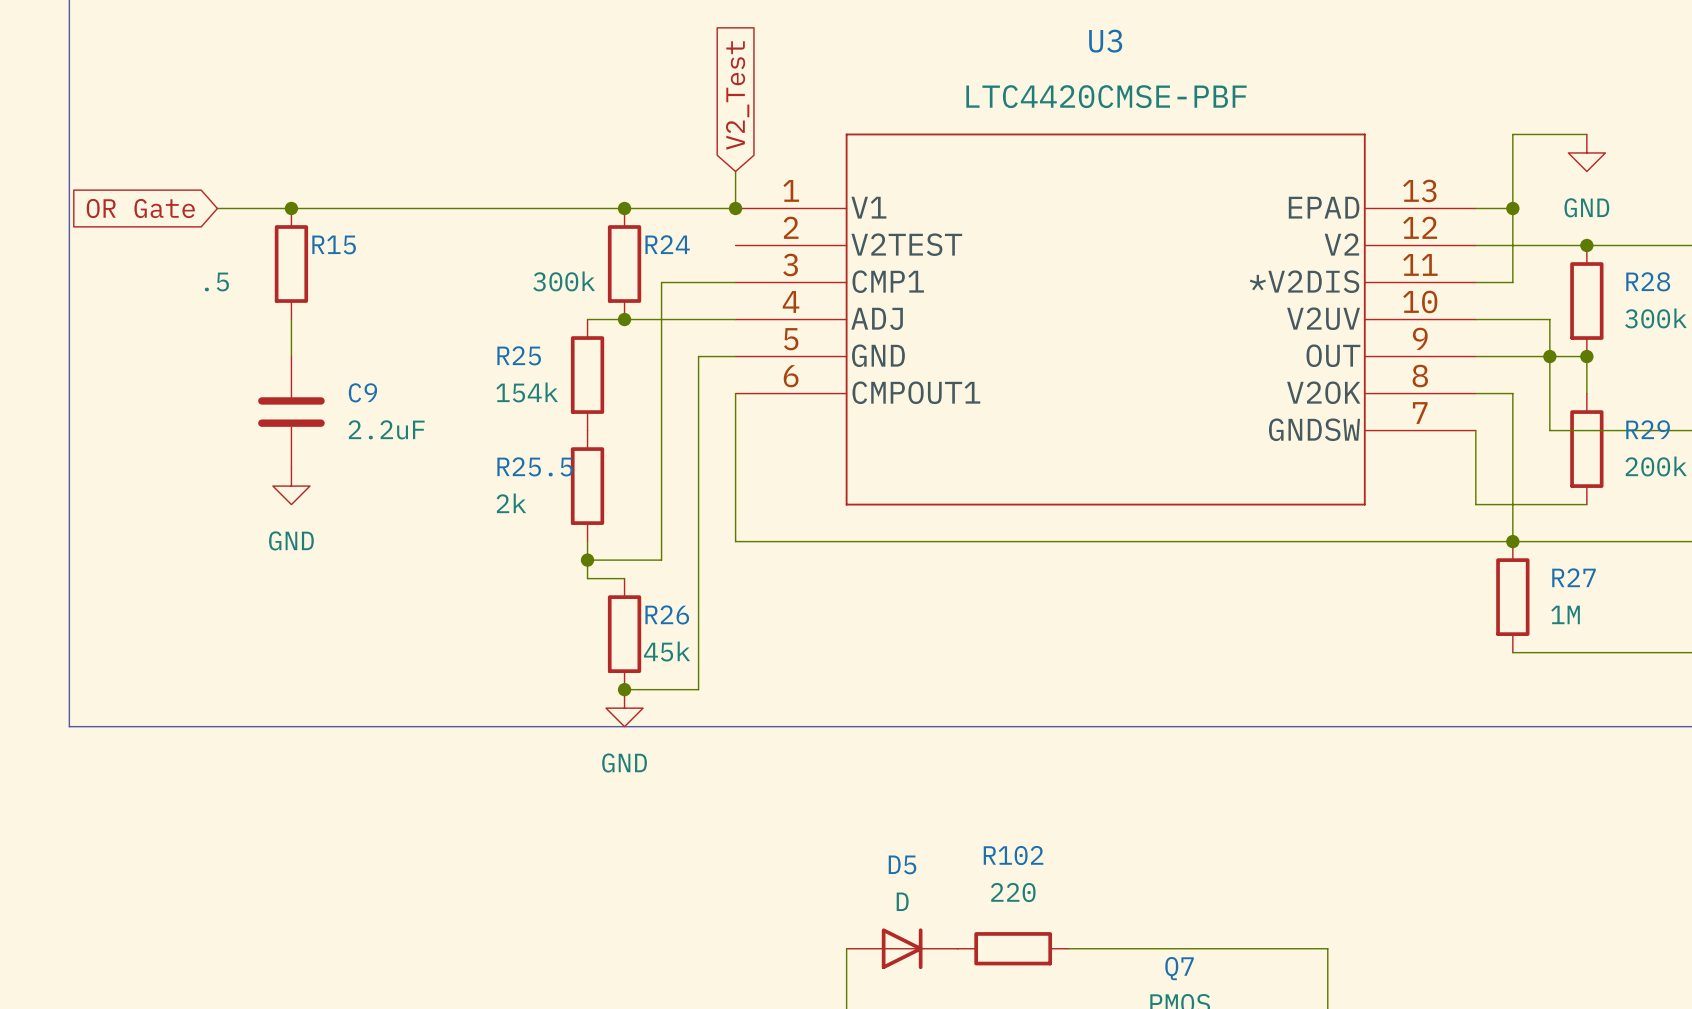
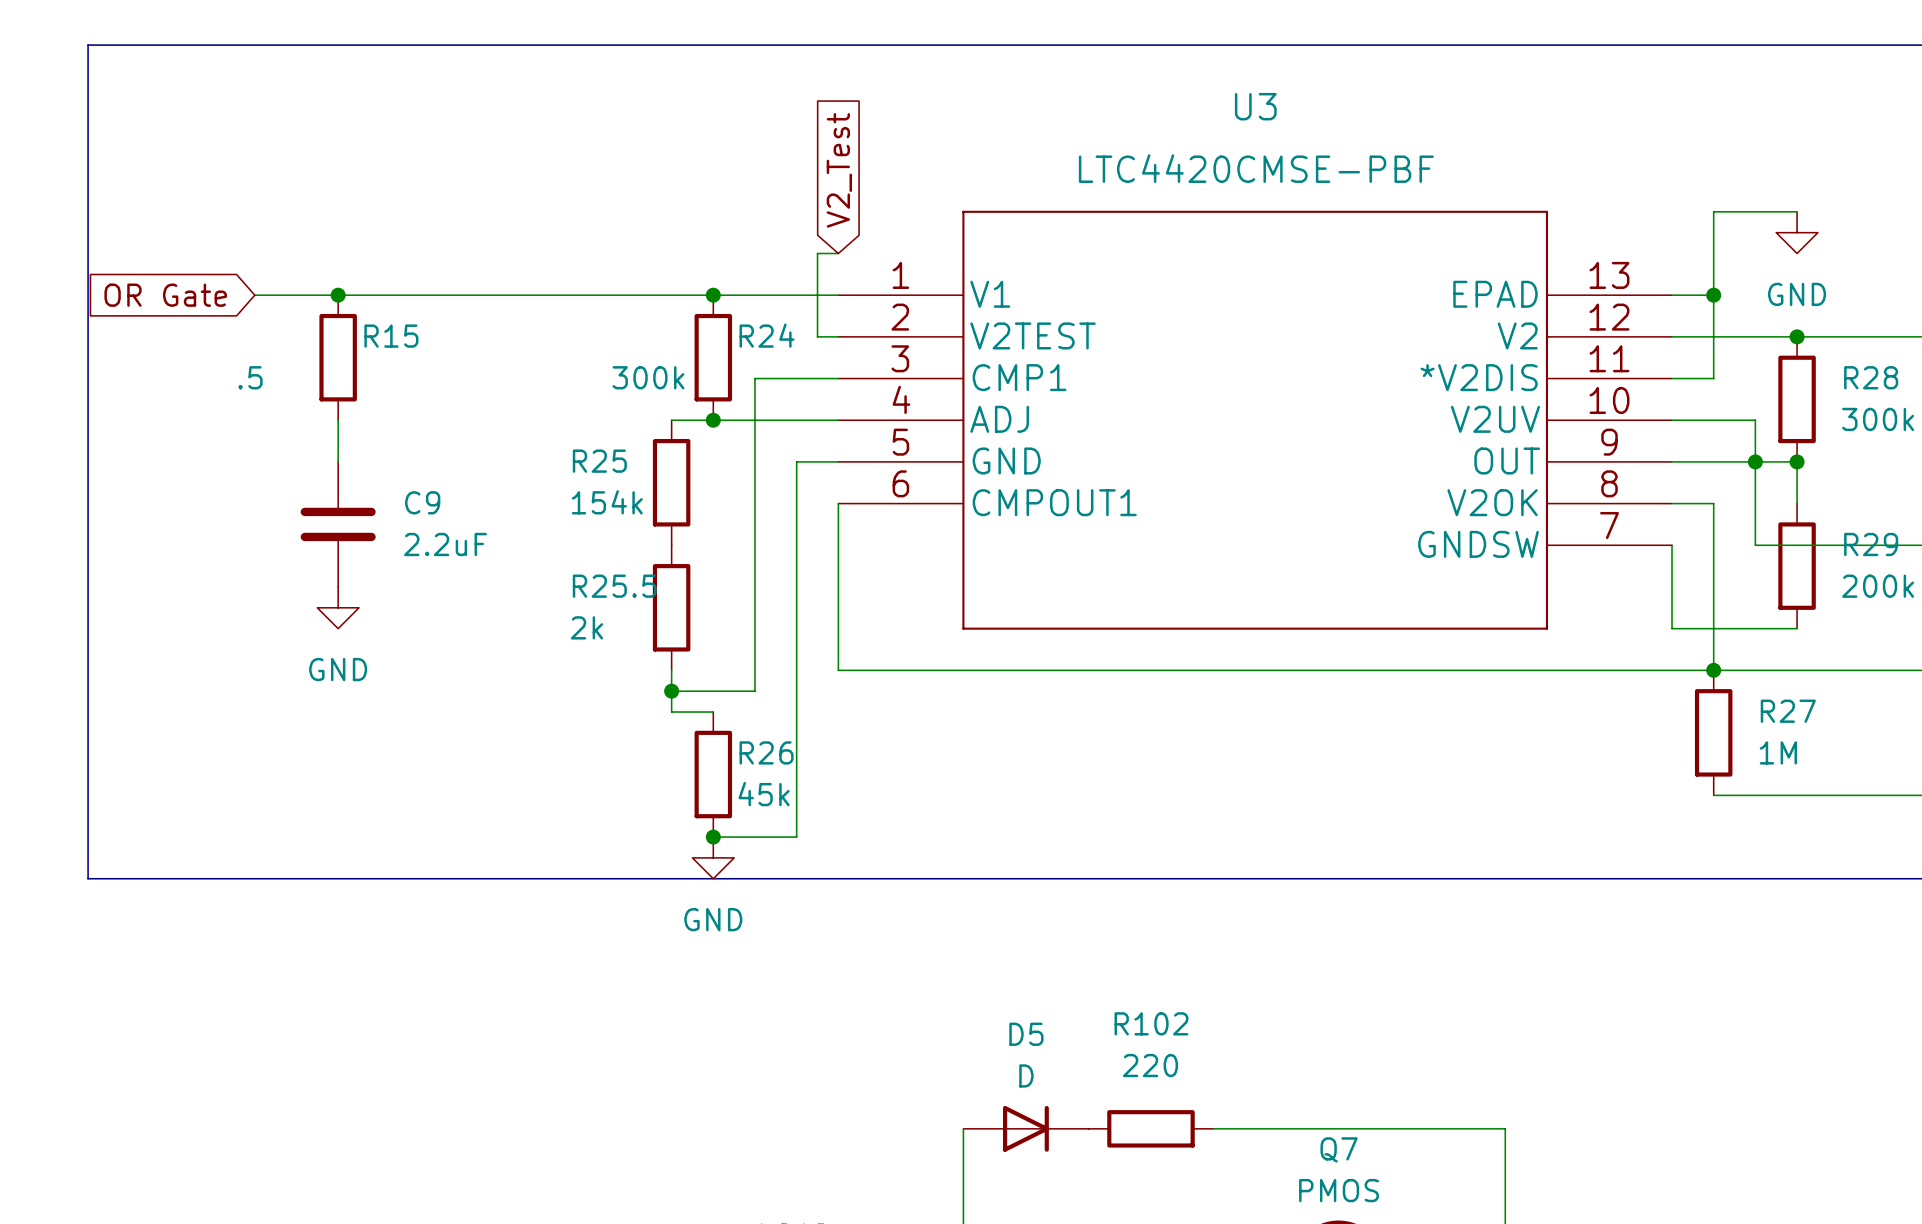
wire: (735, 171) (735, 208) -> (838, 253) (817, 253) (817, 336) (838, 336)
junction: (735, 208) -> none

